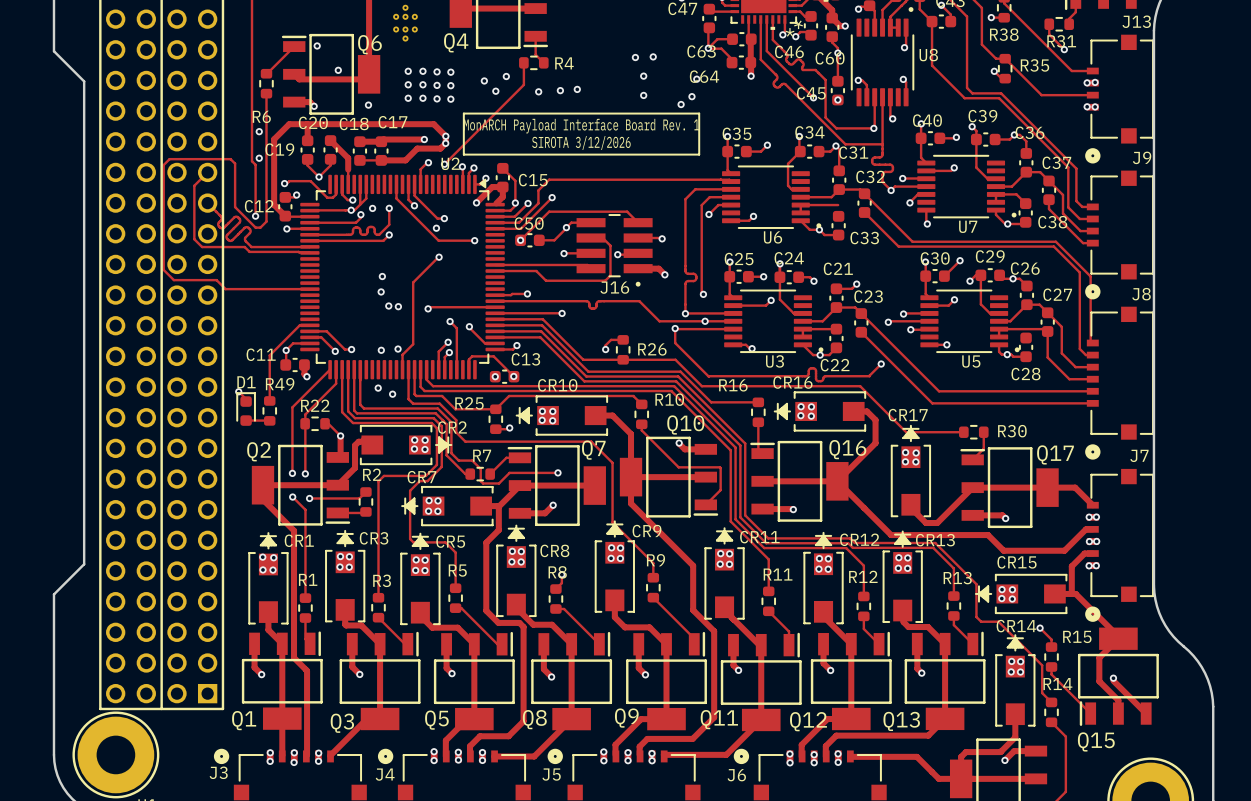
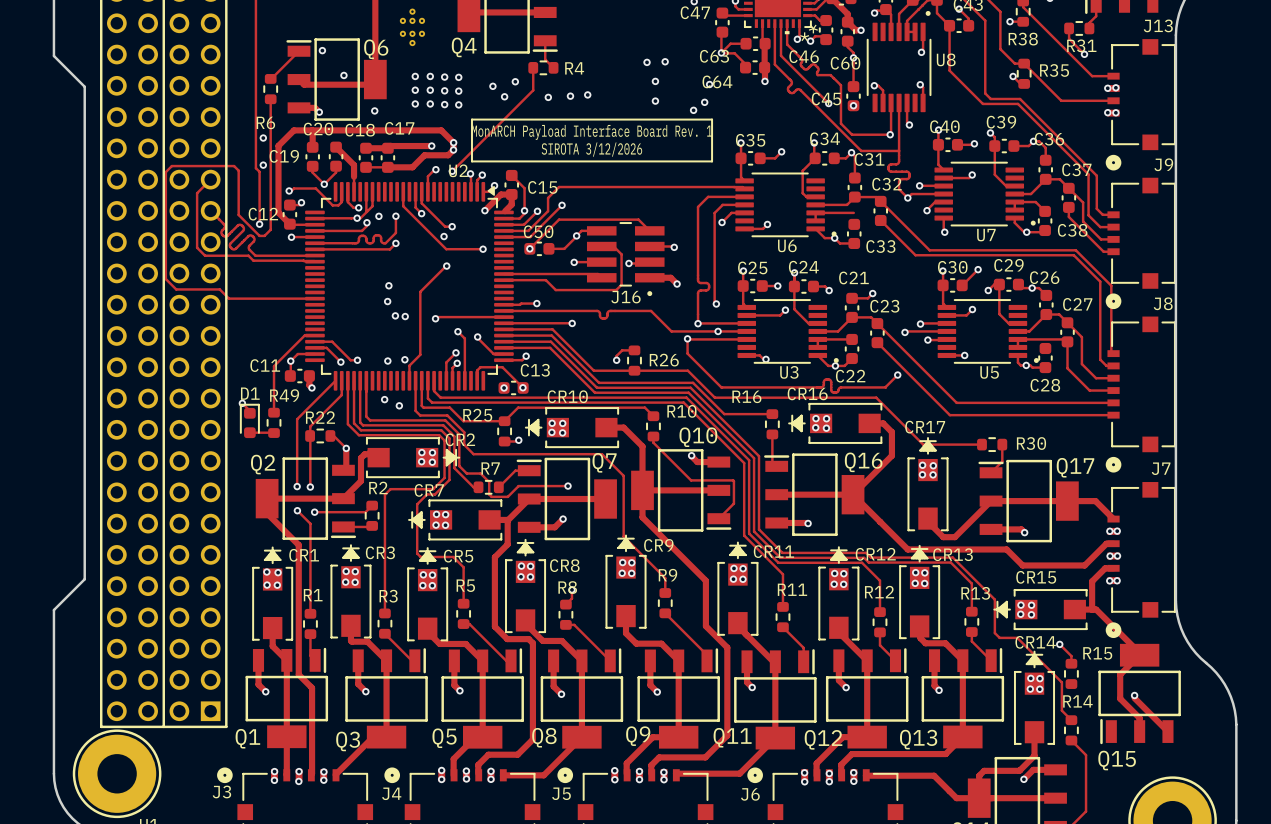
track: (1051, 666) (1051, 674) (1090, 713) -> none

